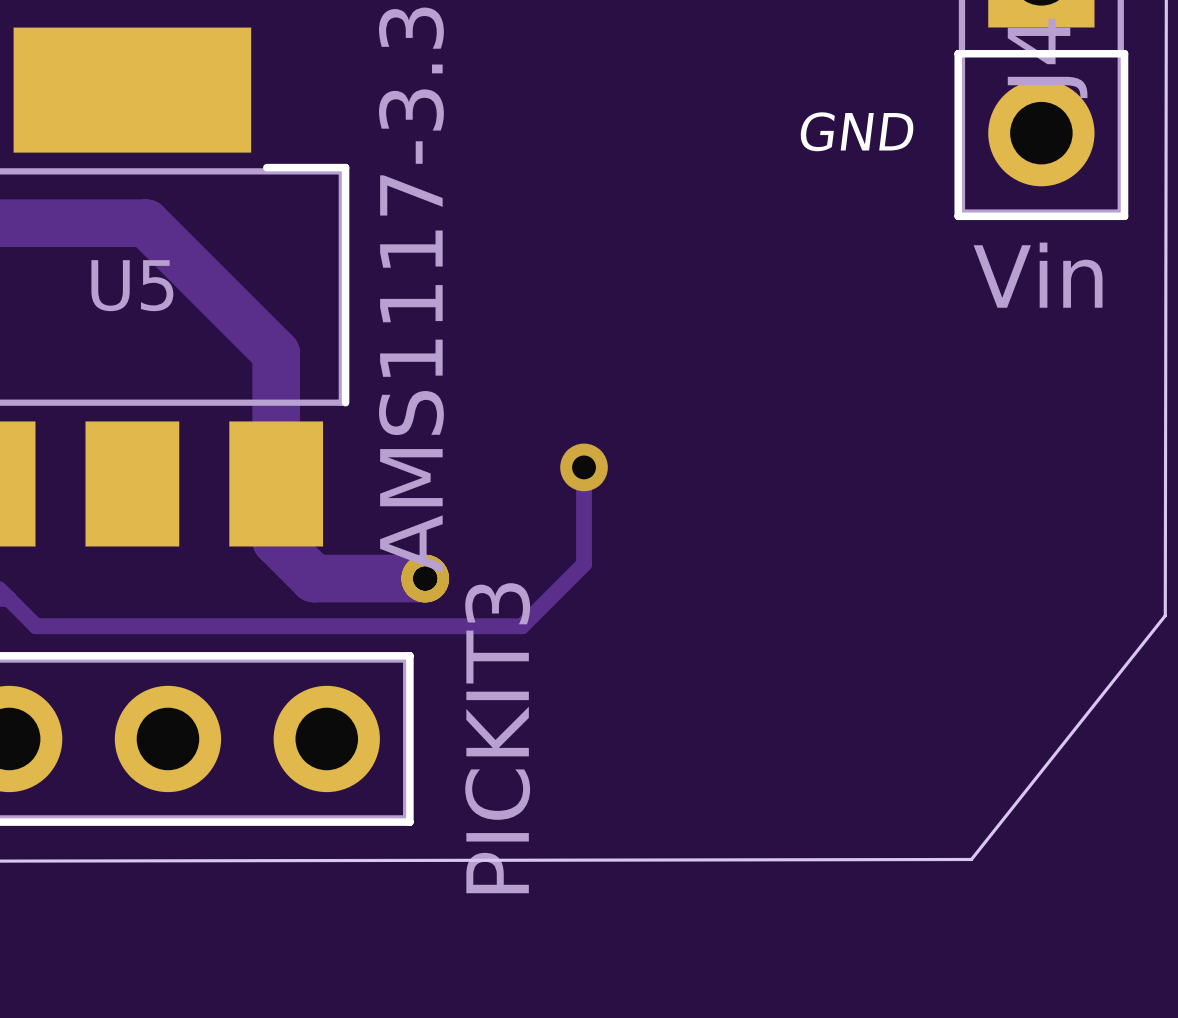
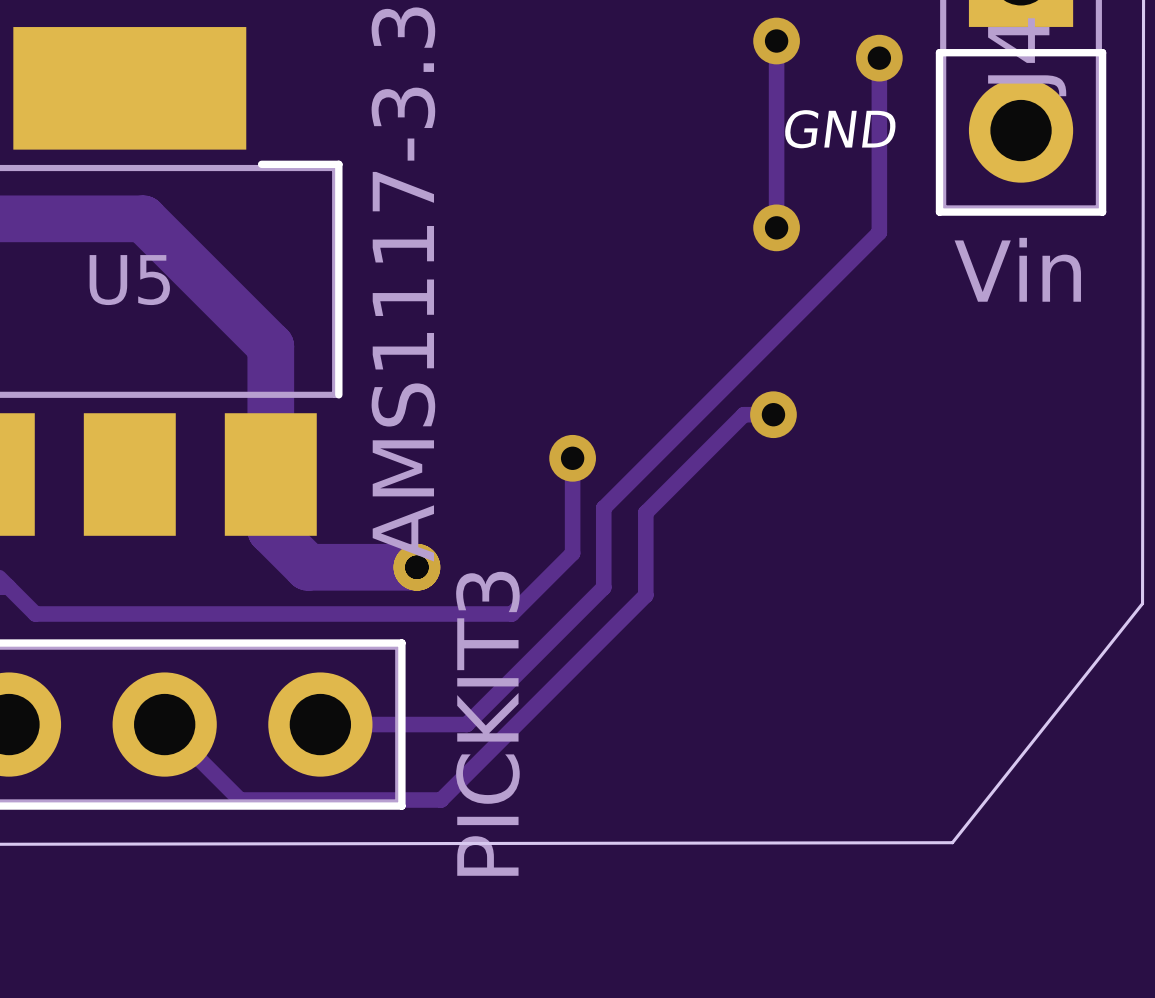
track: none -> (776, 41) (776, 227)
via: none -> (776, 41)
track: none -> (879, 58) (879, 232) (603, 508) (603, 587) (466, 724) (320, 724)
via: none -> (879, 58)
via: none -> (776, 227)
track: none -> (773, 414) (743, 414) (645, 512) (645, 595) (441, 800) (240, 800) (164, 724)
via: none -> (773, 414)

